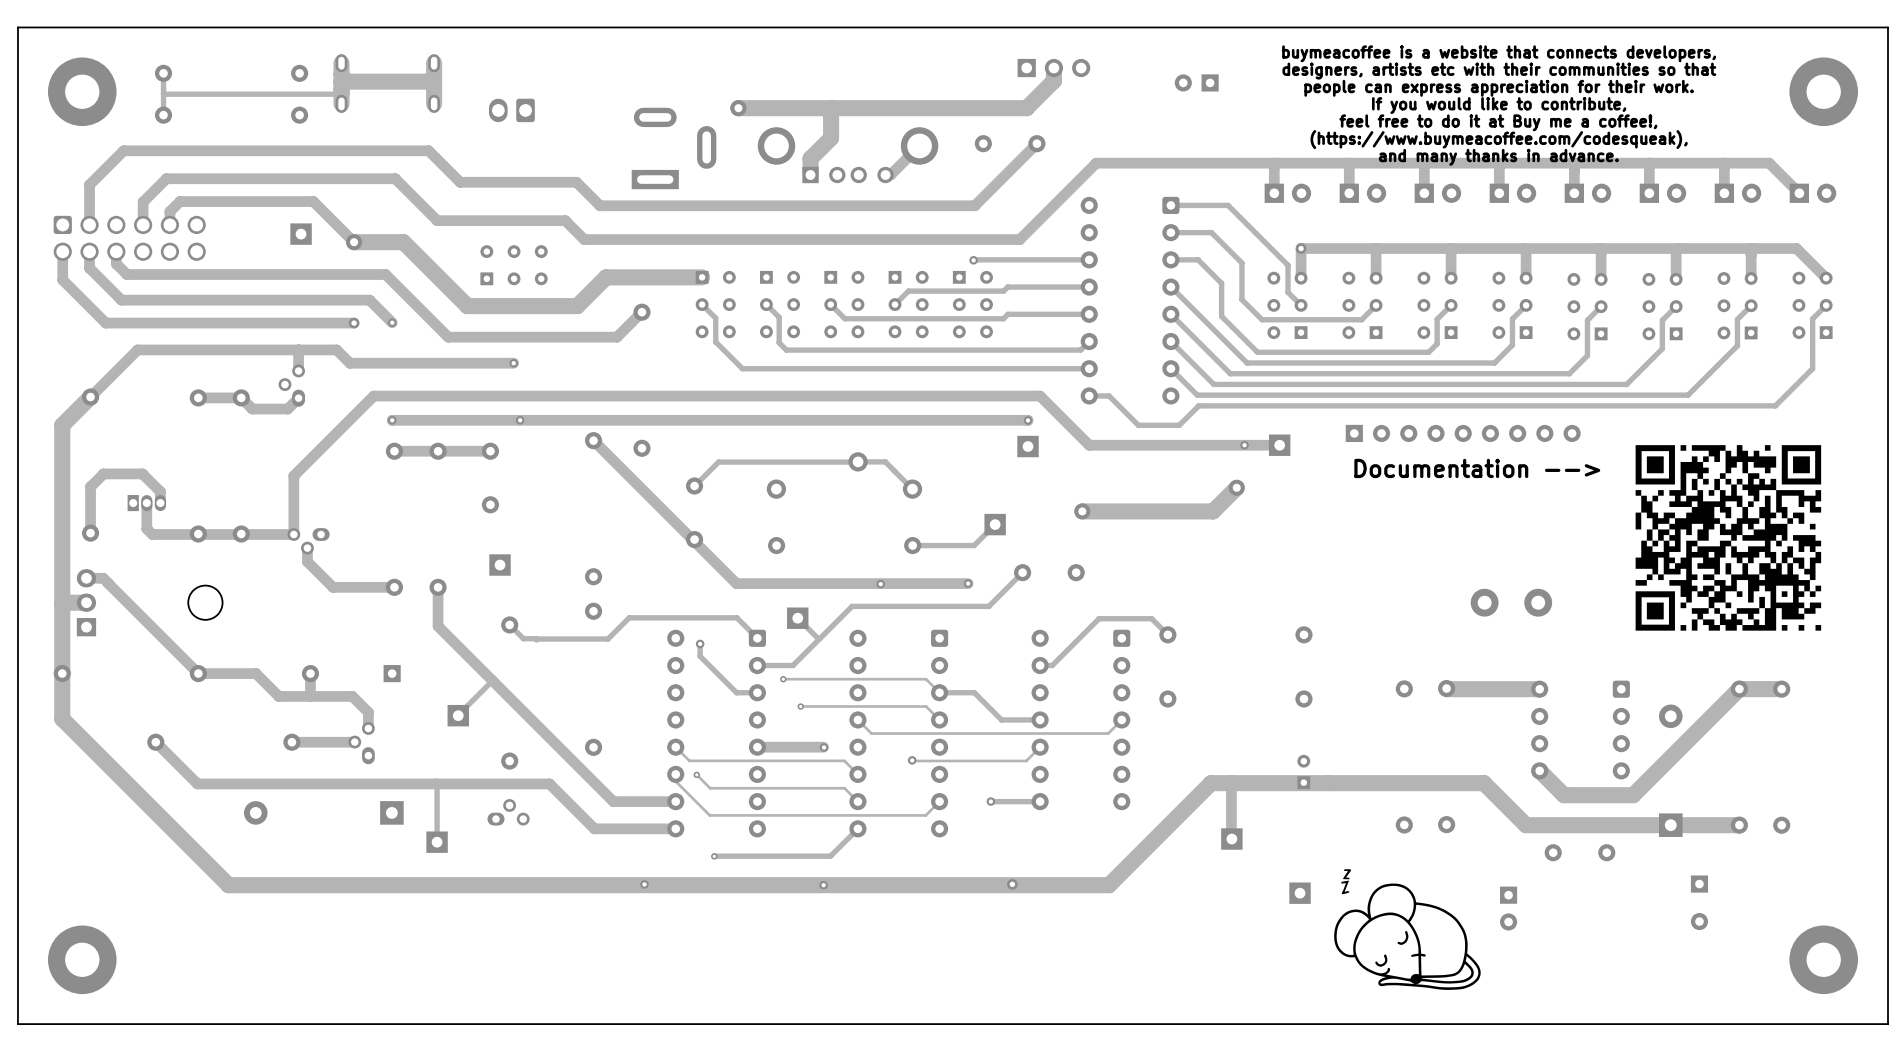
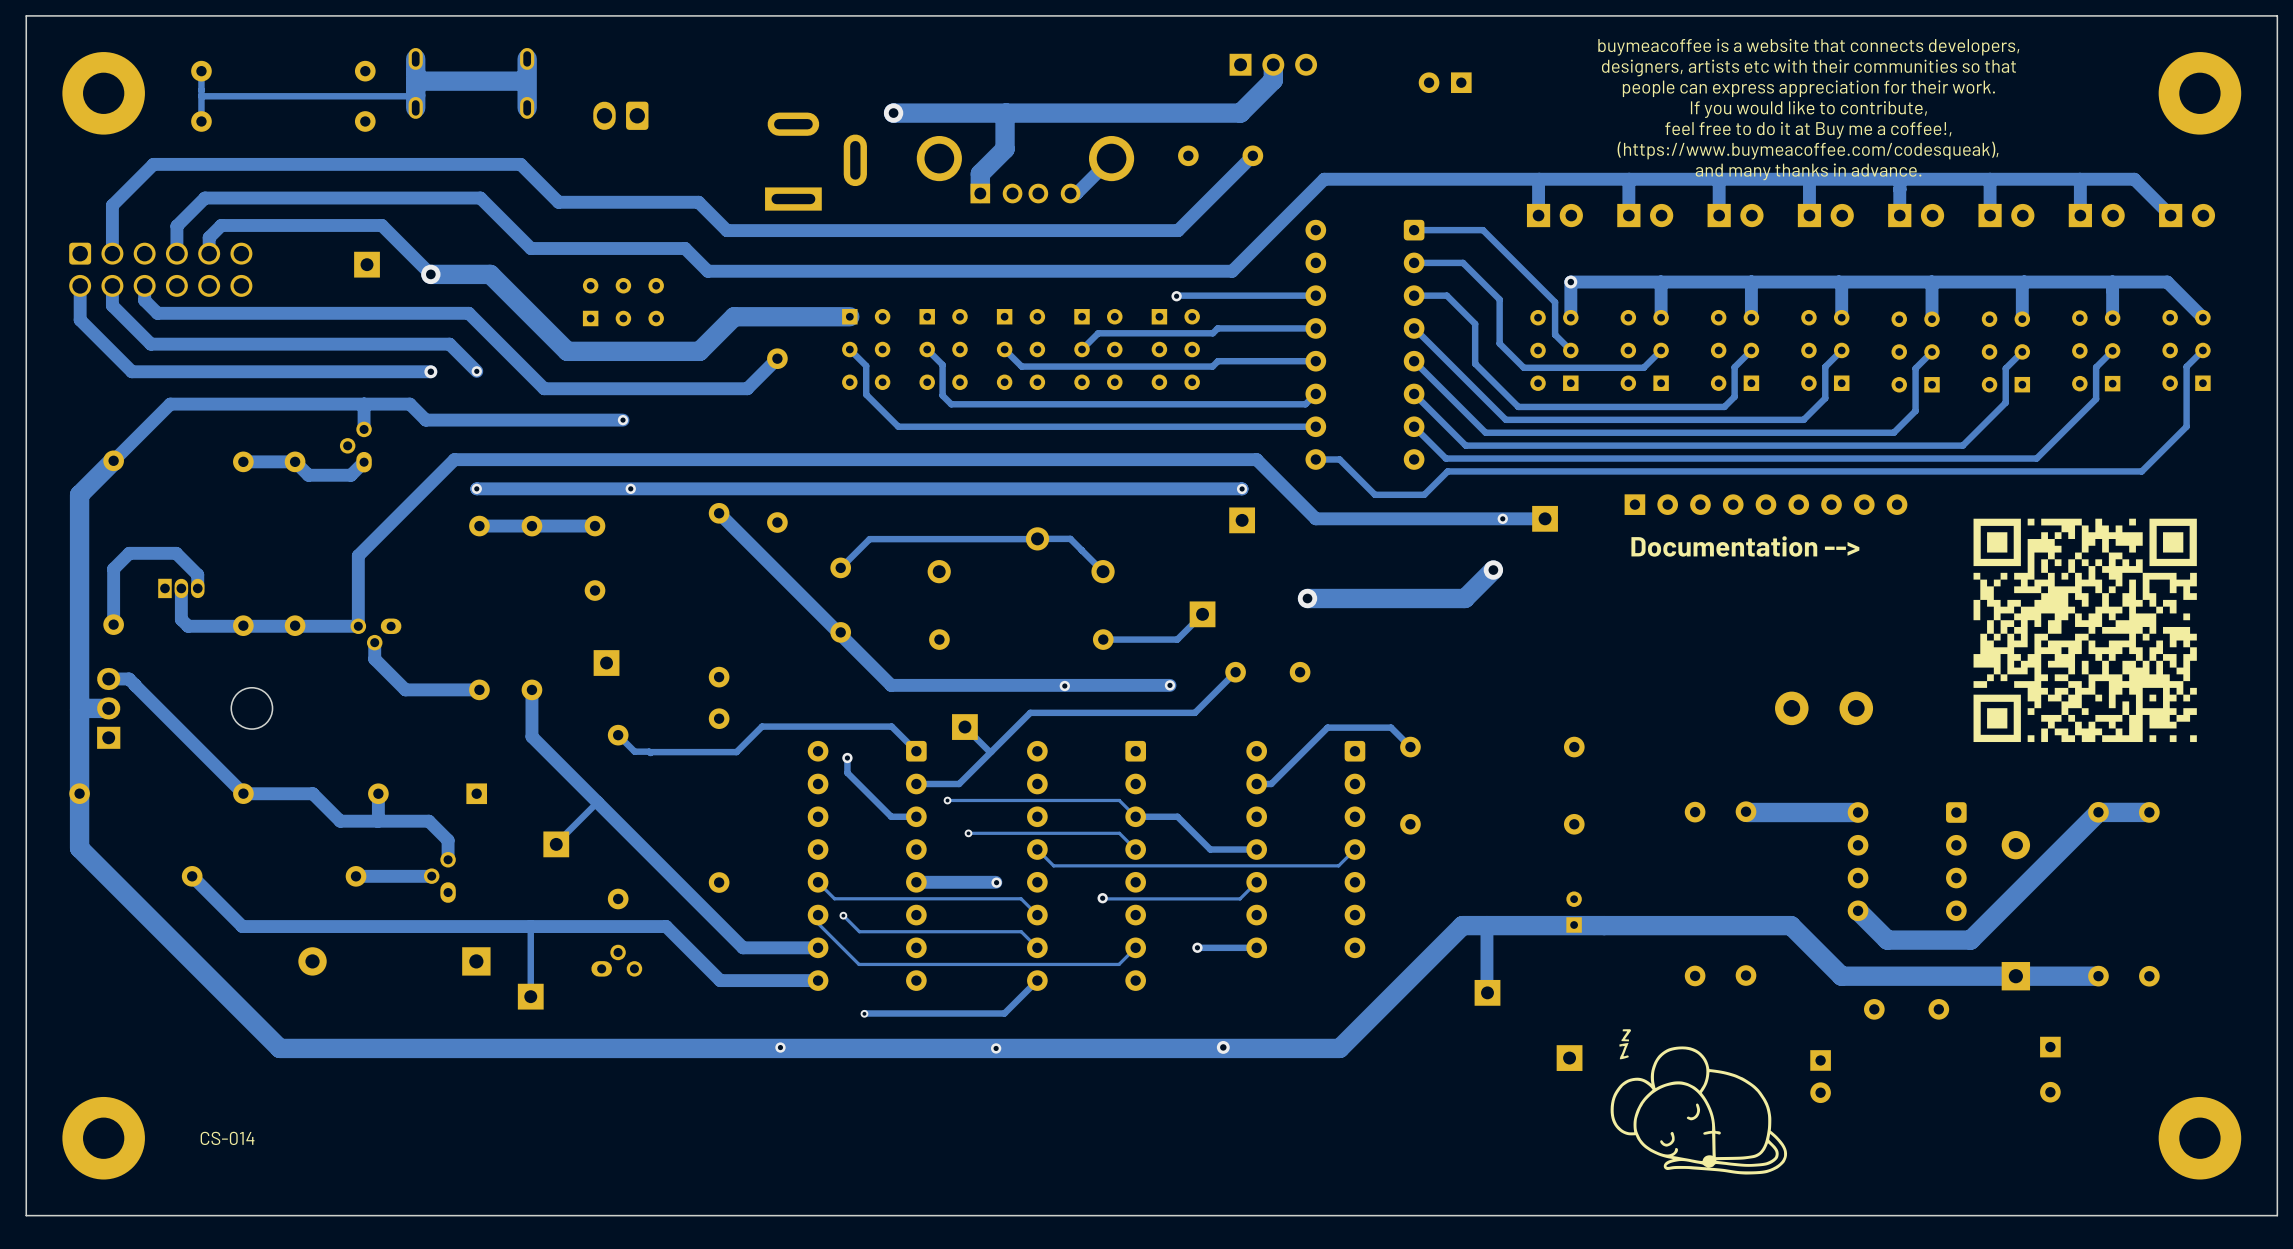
text: none -> CS-014 (227, 1138)

